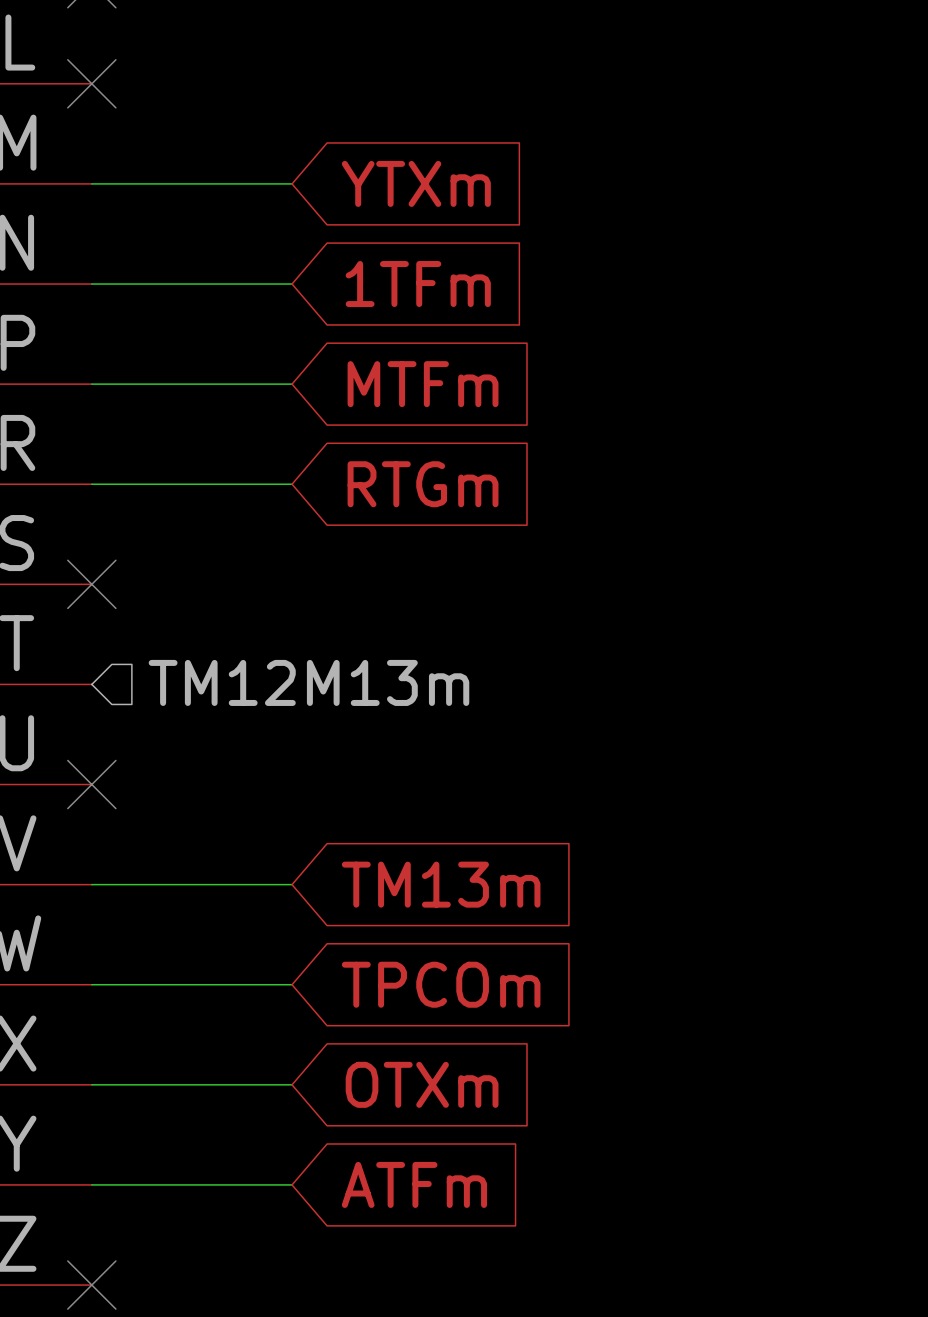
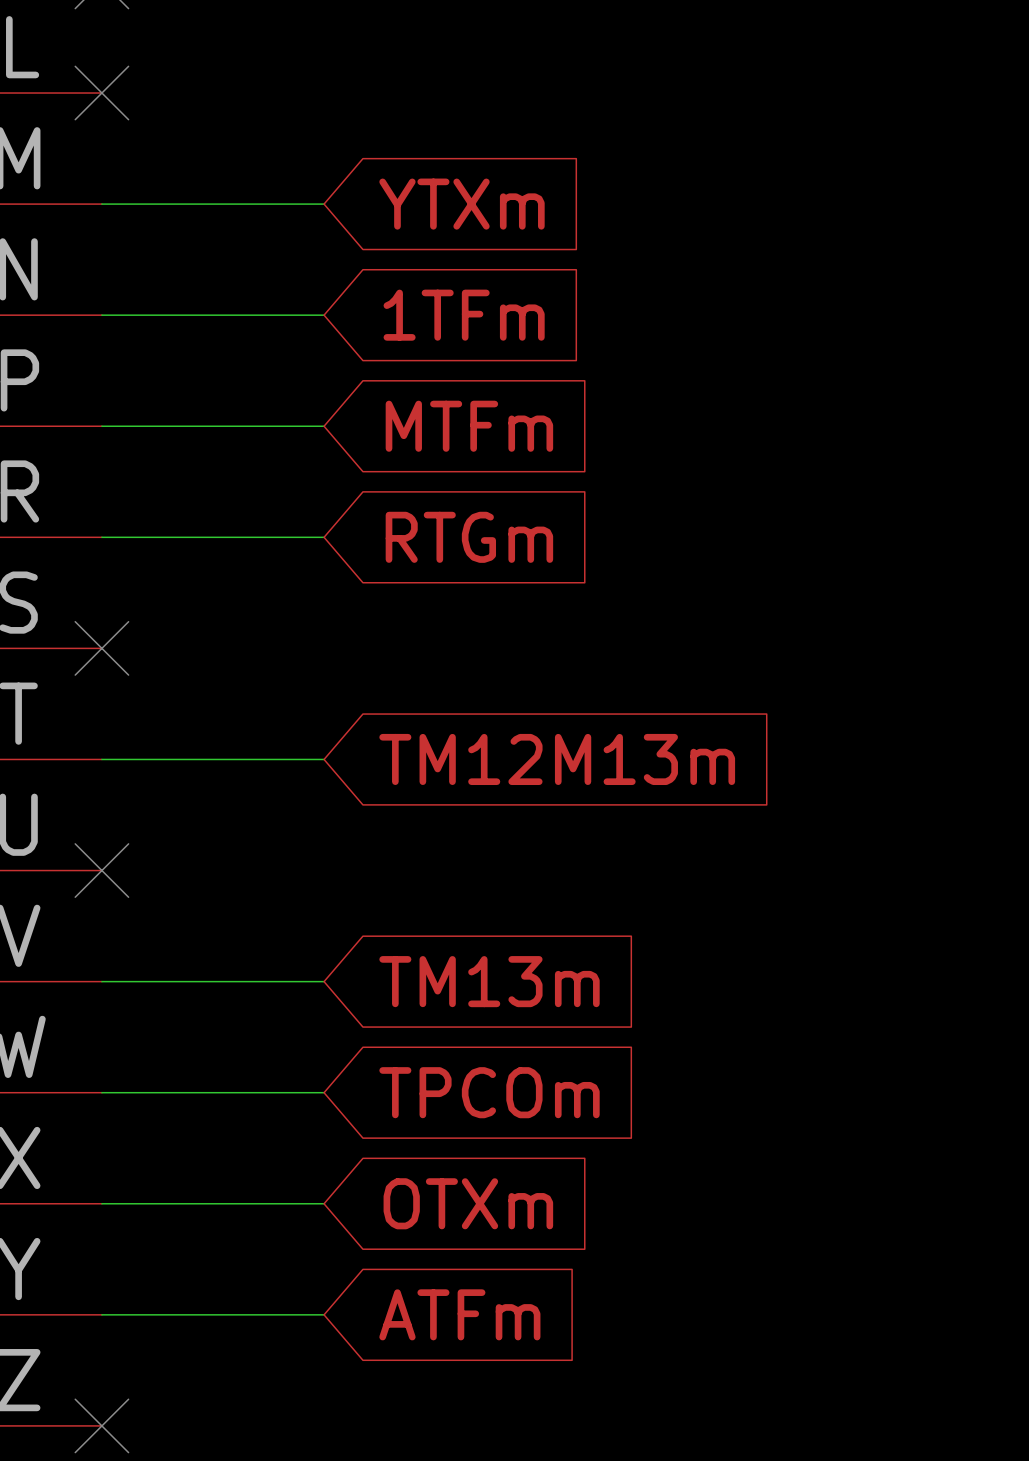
hierarchical label: TM12M13m (308, 682) -> none
wire: none -> (101, 759) (324, 759)
global label: none -> TM12M13m (557, 759)

